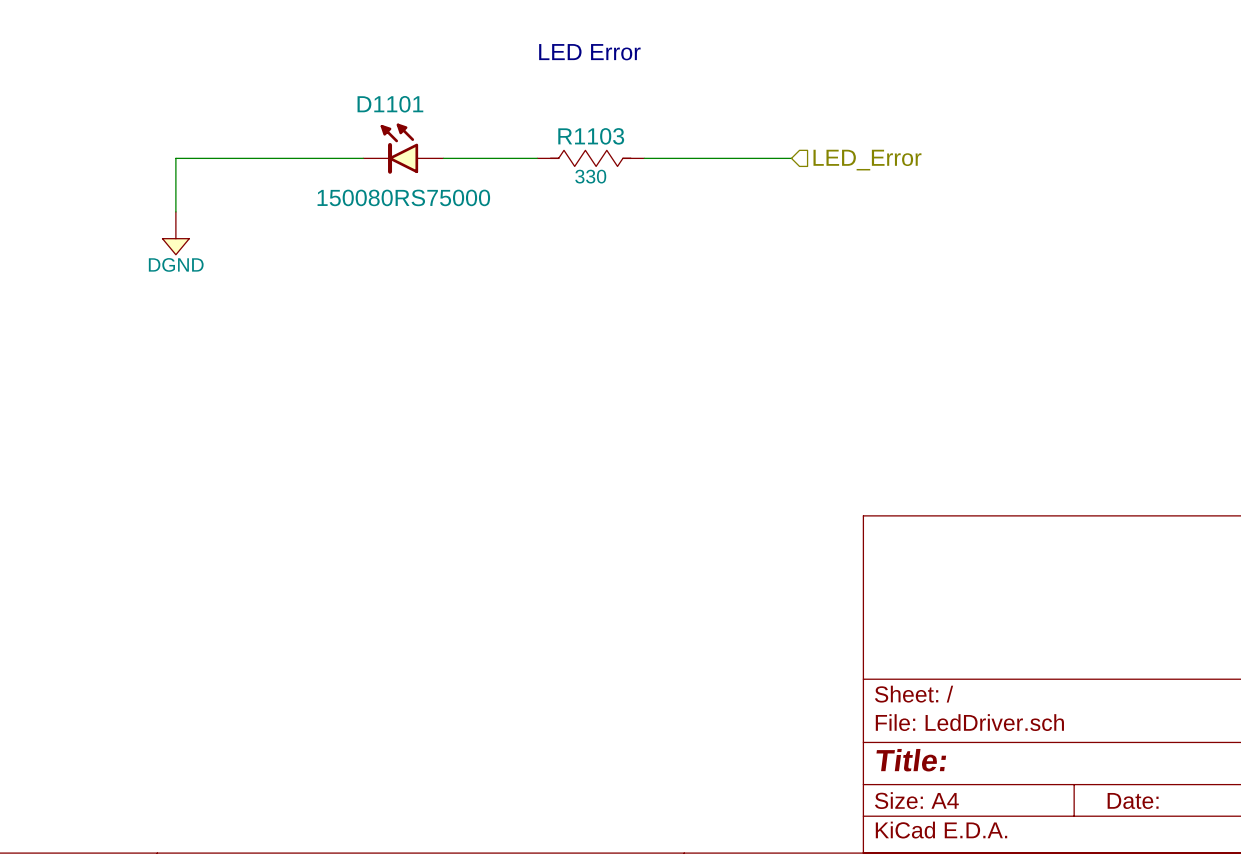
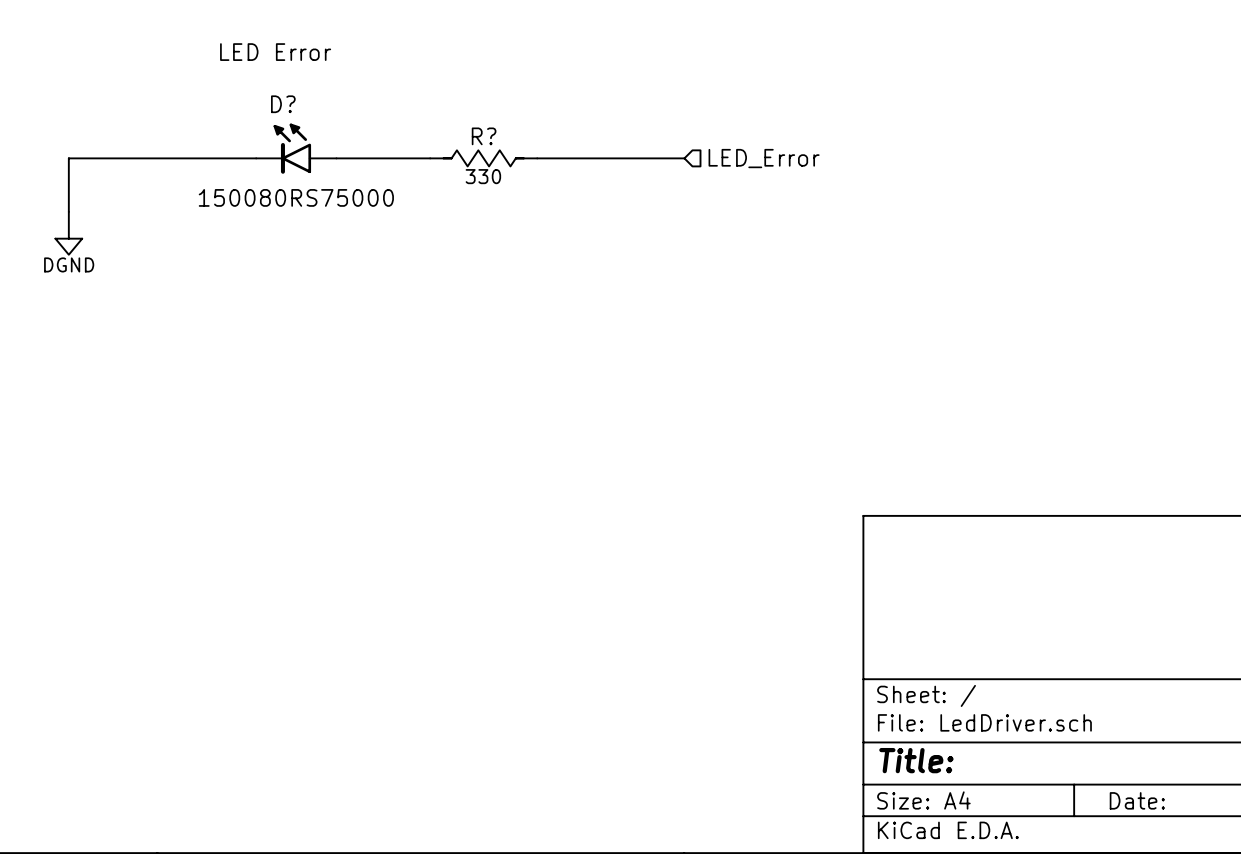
text: none -> LED Error (275, 52)
text: LED Error (589, 52) -> none
D?: none -> 150080RS75000 (296, 148)
D1101: 150080RS75000 (403, 148) -> none
wire: (175, 158) (175, 211) -> (175, 158) (68, 158) (68, 211)
R?: none -> (483, 158)
R1103: (590, 158) -> none
wire: (684, 158) (791, 158) -> none
hierarchical label position: LED_Error (867, 160) -> LED_Error (764, 158)
power symbol position: DGND (175, 233) -> DGND (68, 233)

